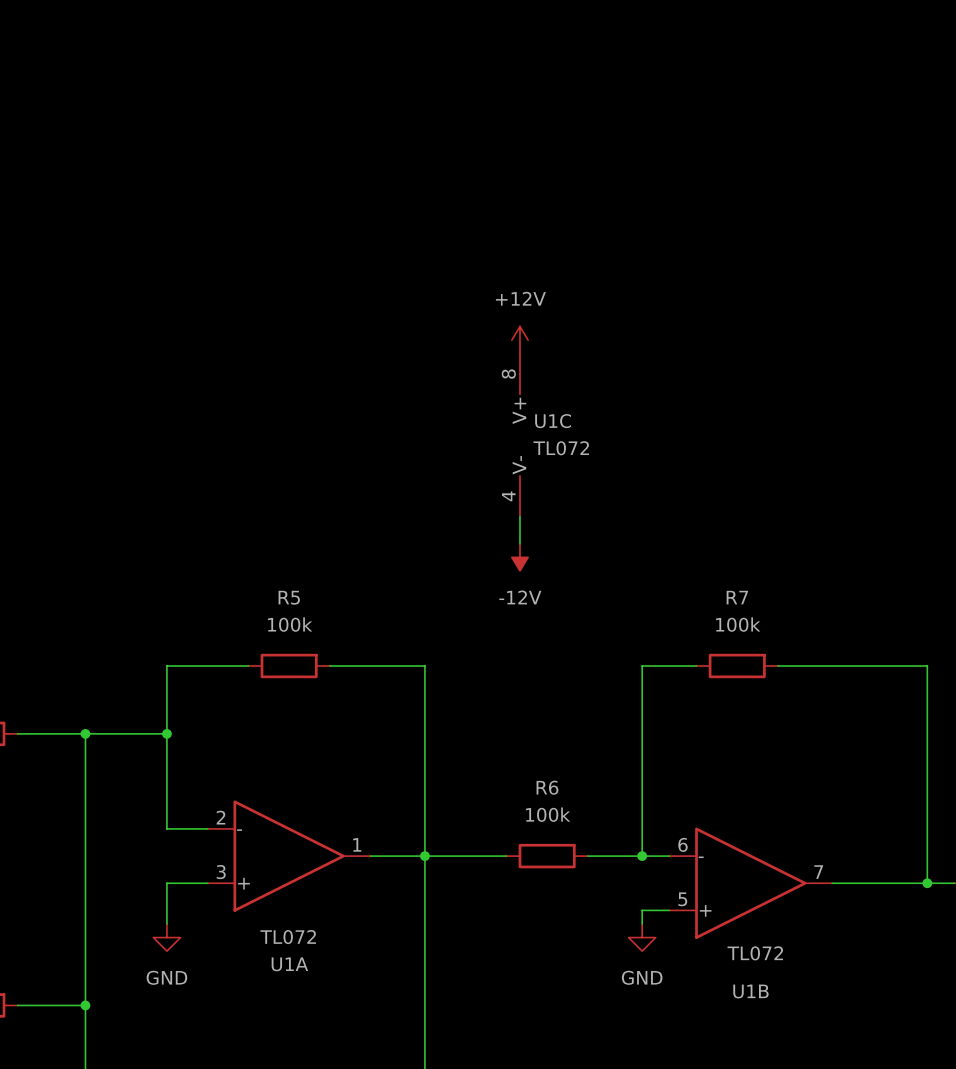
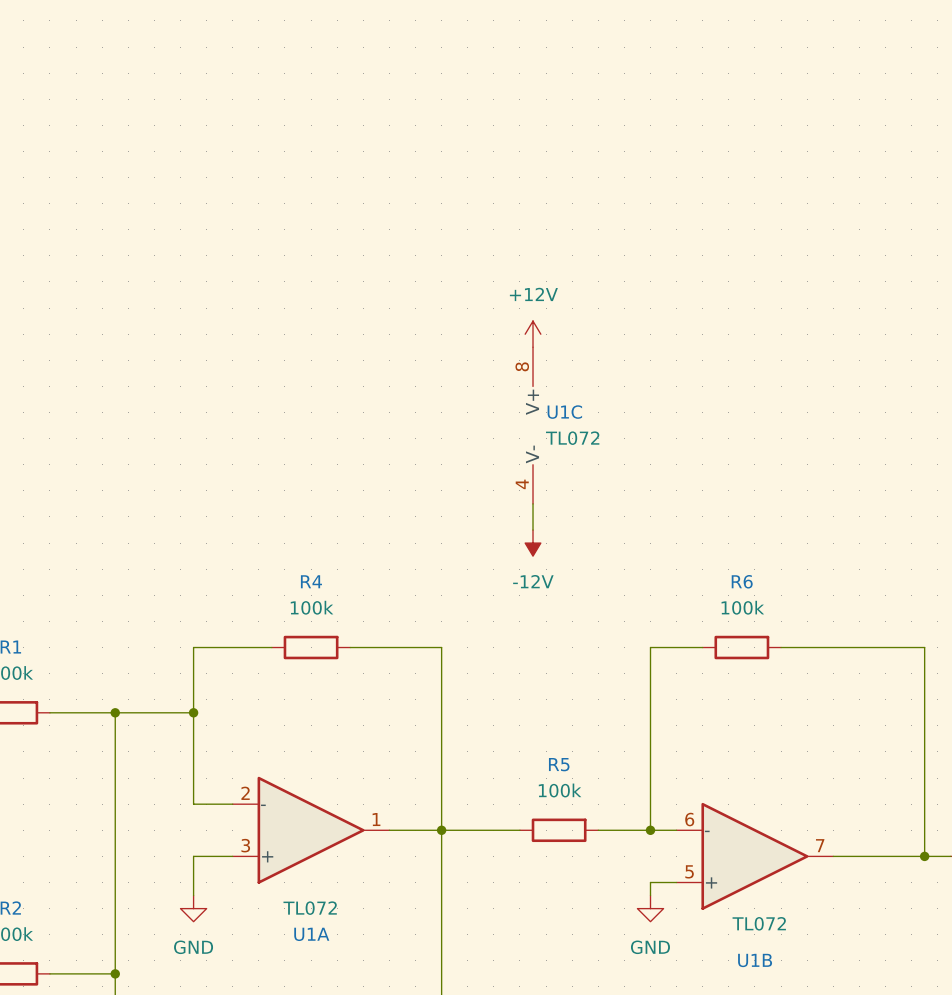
R5 name: R5 (289, 597) -> R4 (311, 581)
R7 name: R7 (737, 597) -> R6 (742, 581)
R6 name: R6 (547, 787) -> R5 (559, 764)

